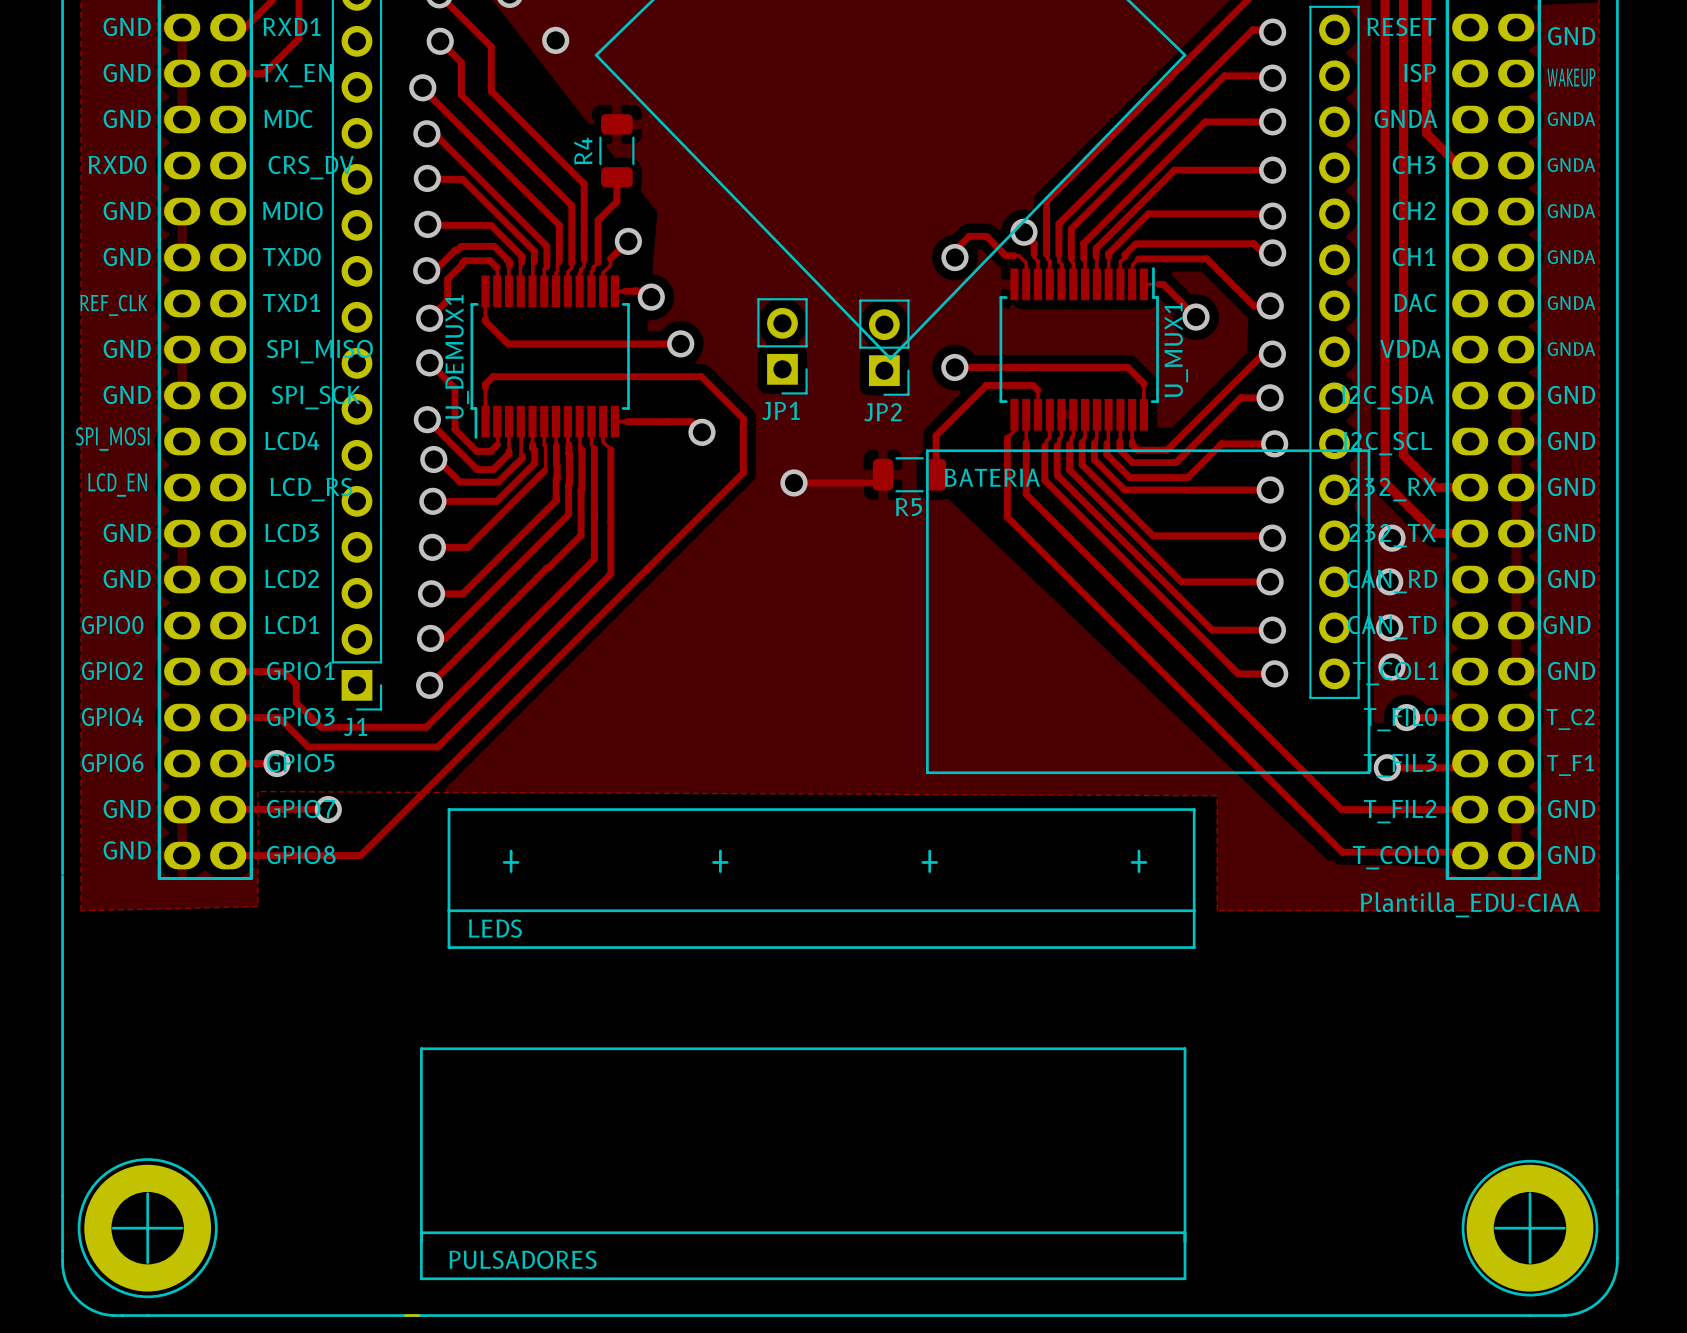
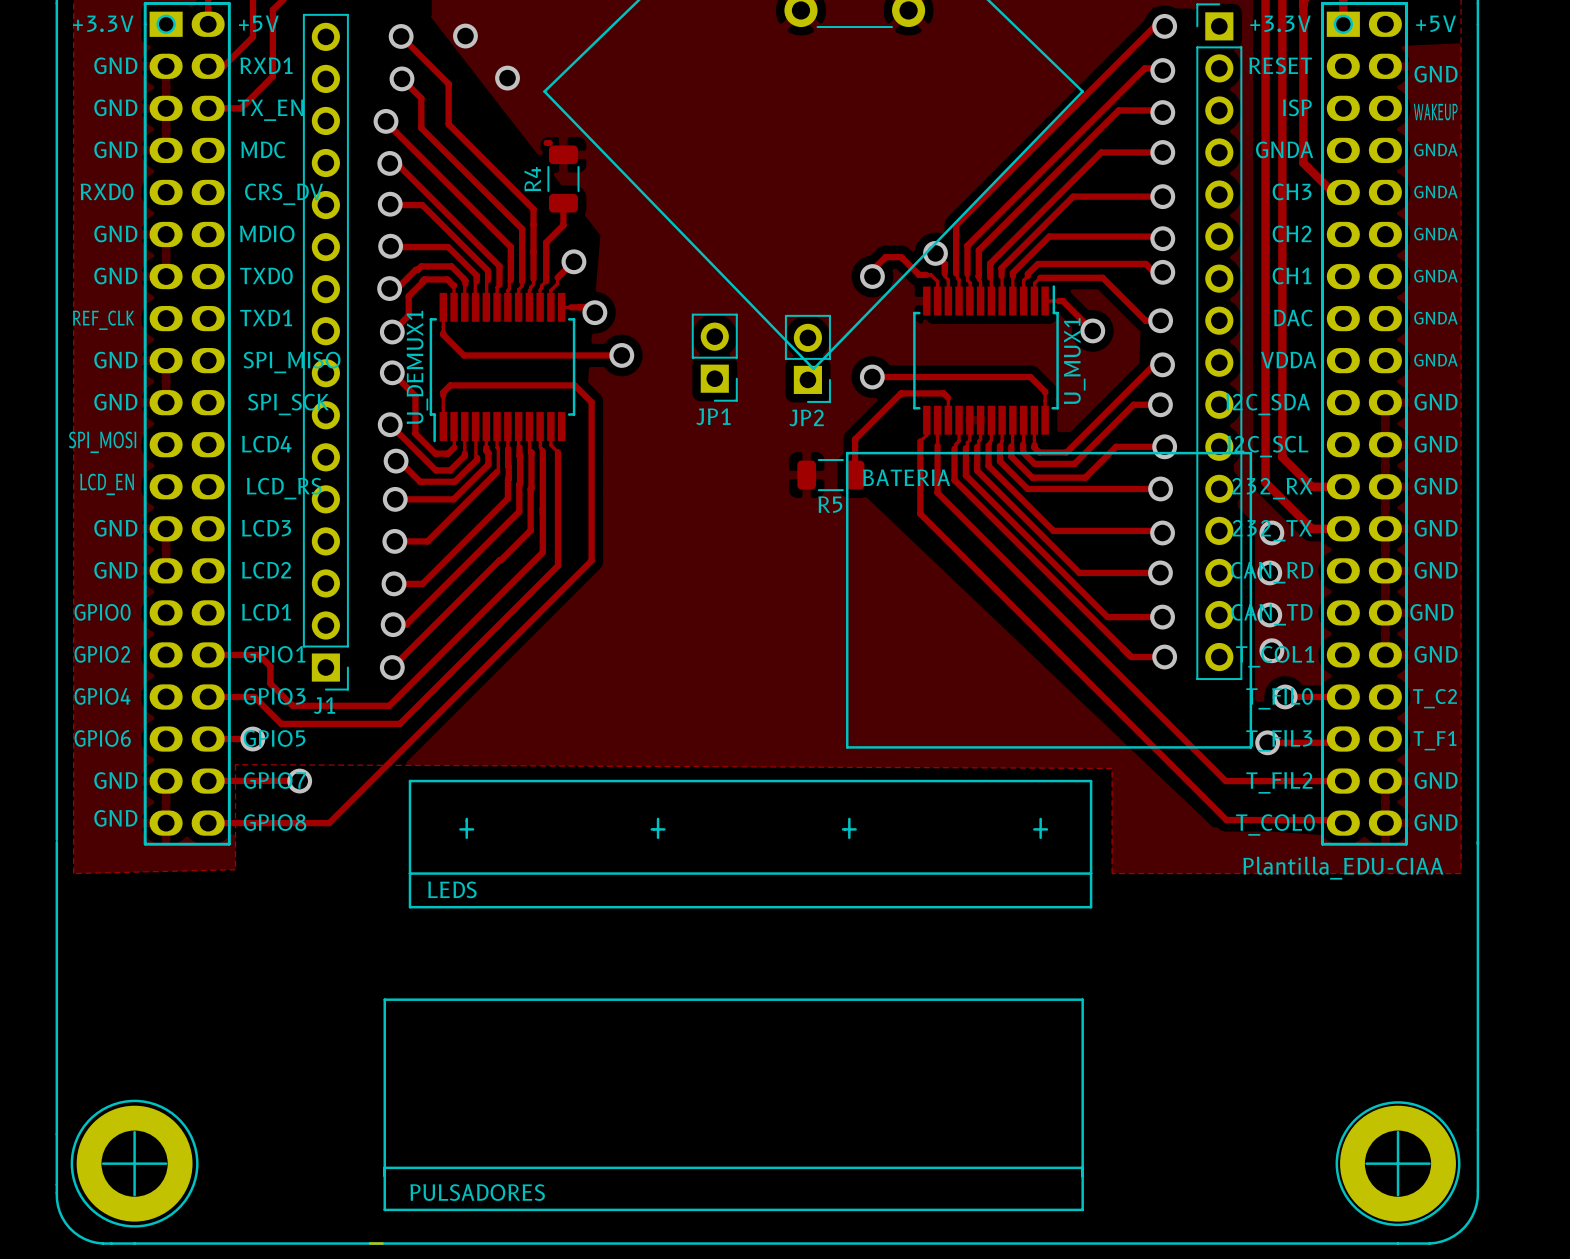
track: none -> (546, 143) (549, 143)
track: (629, 376) (701, 376) (743, 418) (743, 472) (647, 568) -> (574, 385) (591, 402) (591, 560)
track: (614, 421) (691, 421) (701, 432) -> none
via: (701, 432) -> none
track: (883, 474) (874, 482) (793, 482) -> none
via: (793, 482) -> none

